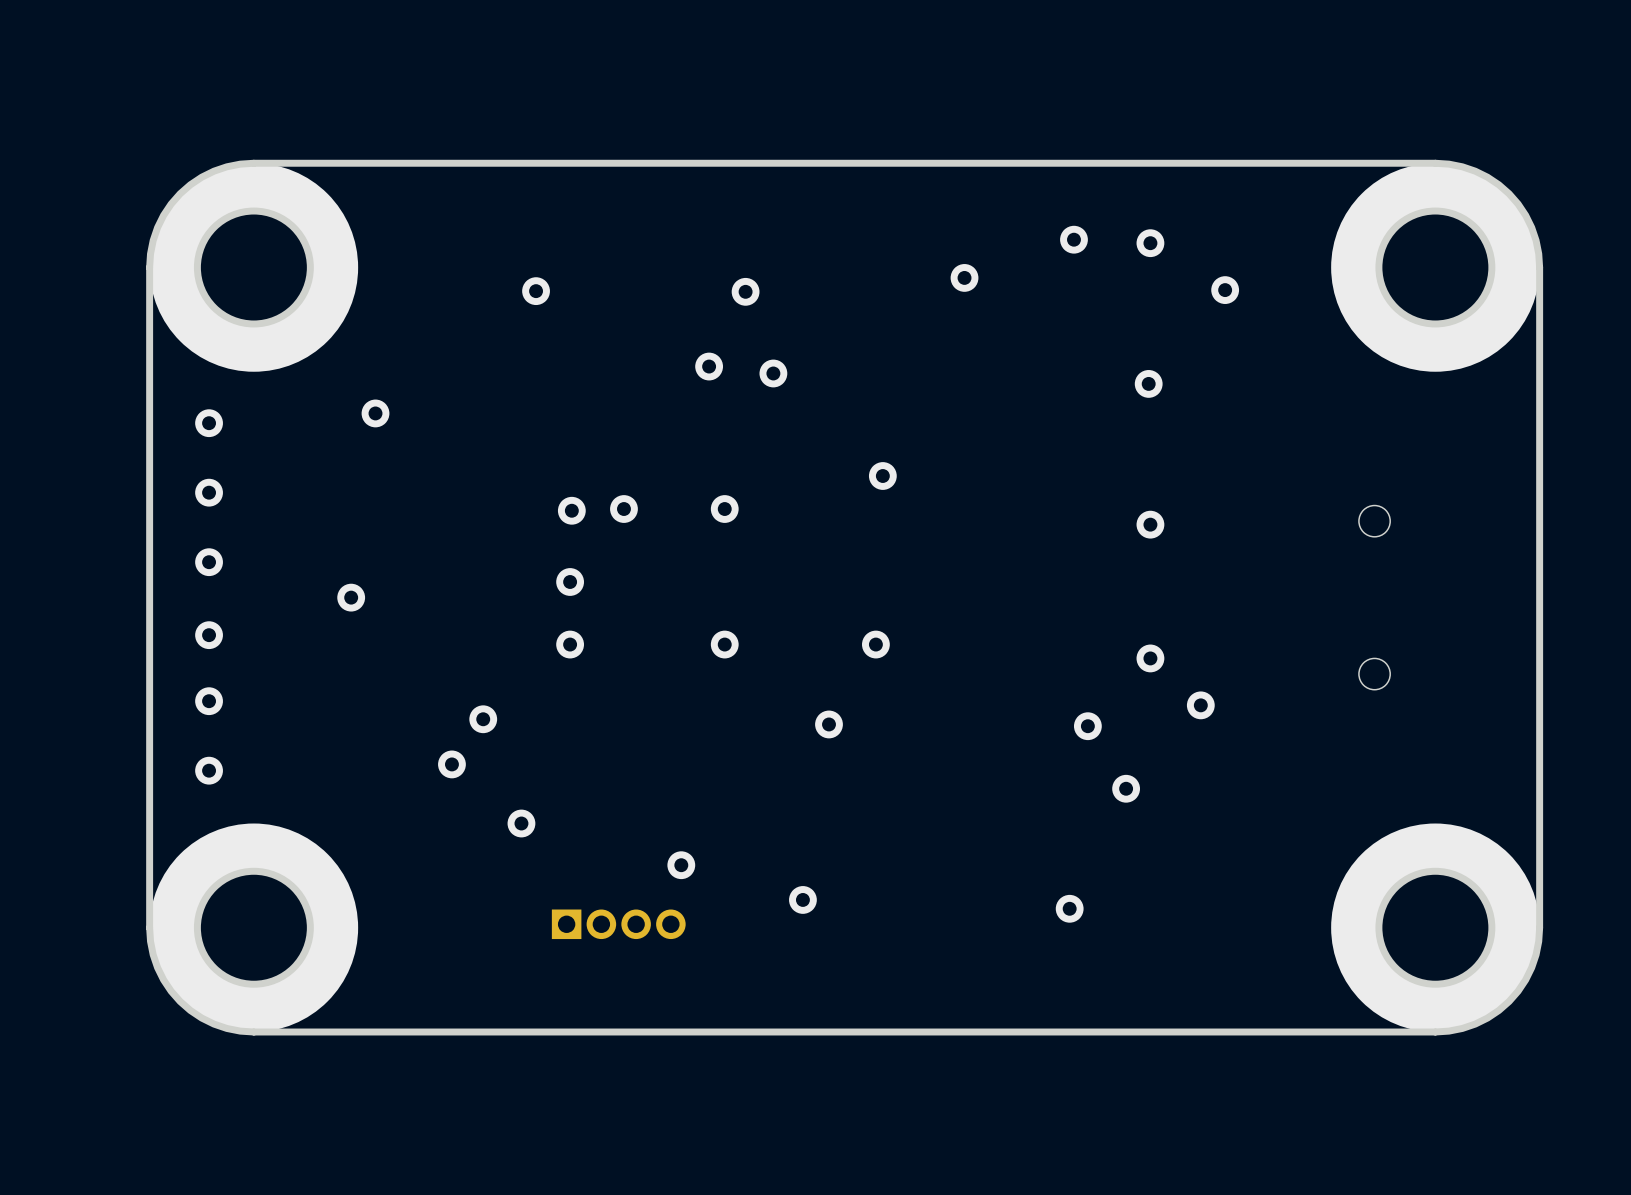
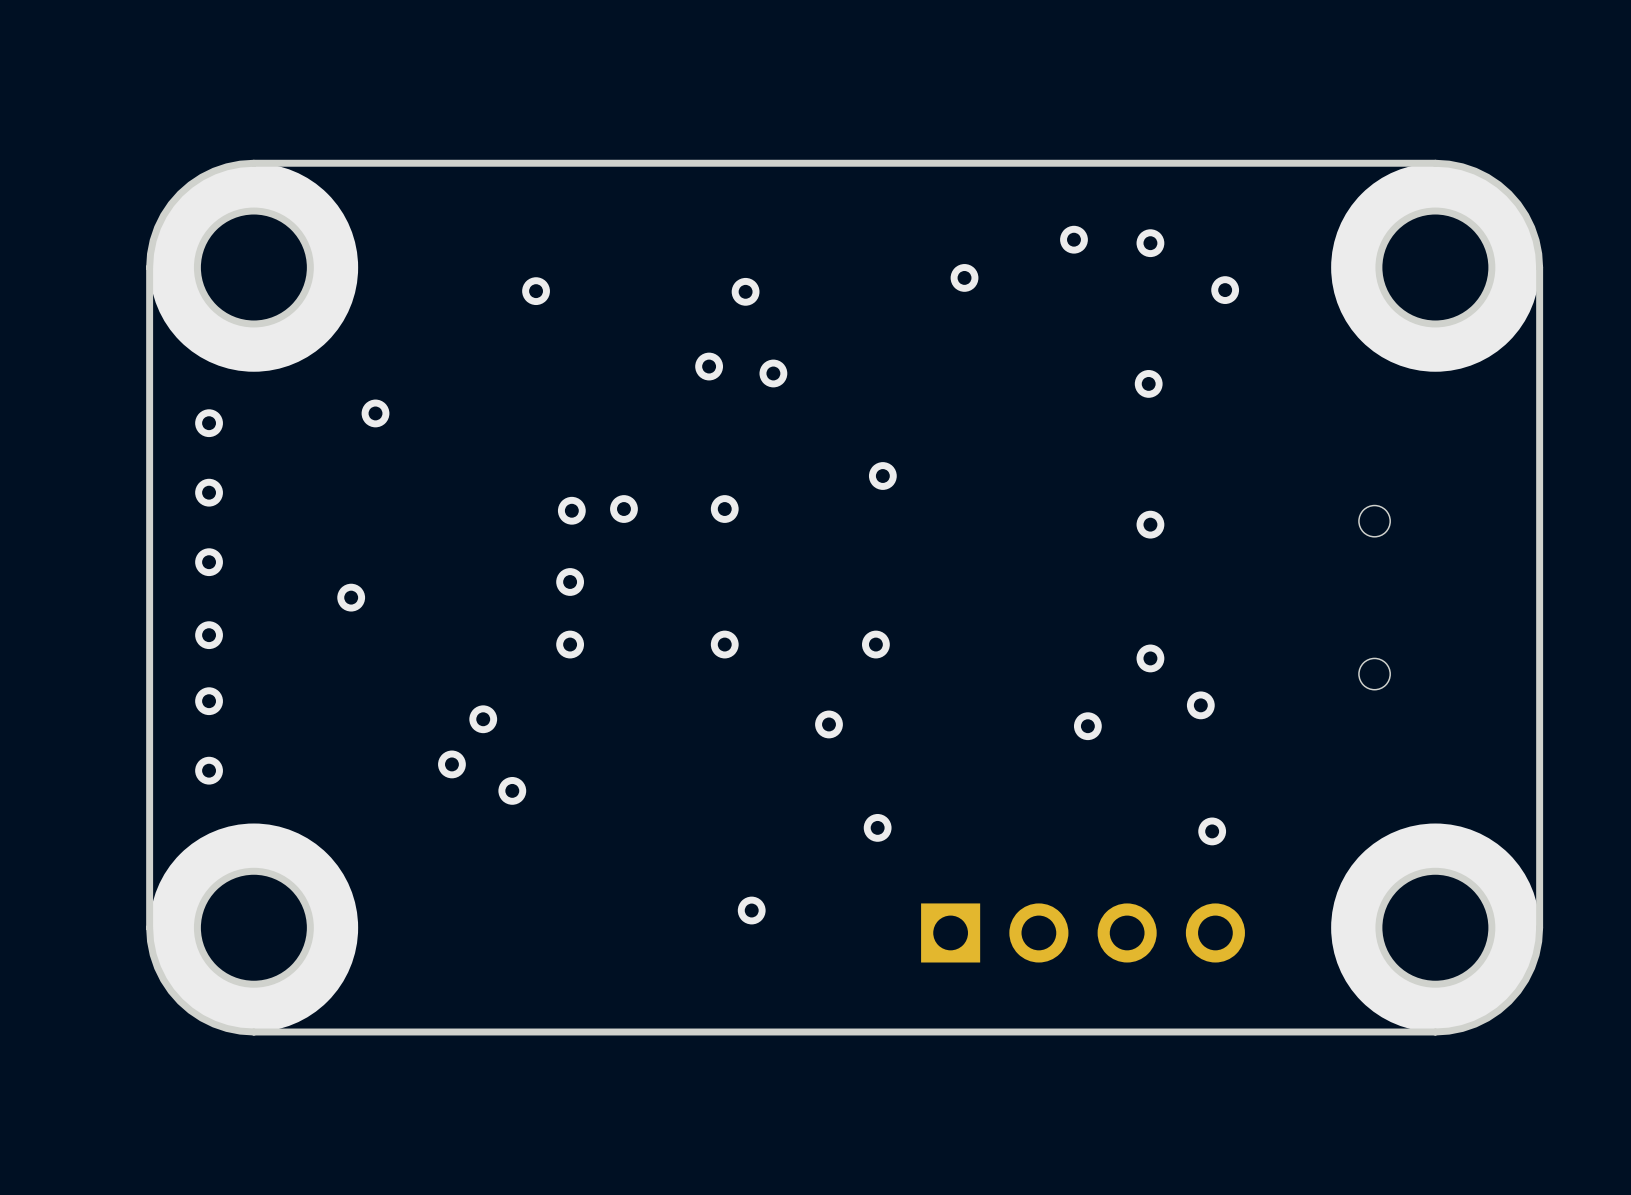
via: (1126, 788) -> none
via position: (521, 823) -> (512, 790)
via: none -> (877, 827)
via: none -> (1212, 831)
via: (681, 865) -> none
via: (802, 899) -> none
via: (1069, 908) -> none
via: none -> (751, 910)
part: (618, 924) -> none
part: none -> (1083, 932)

